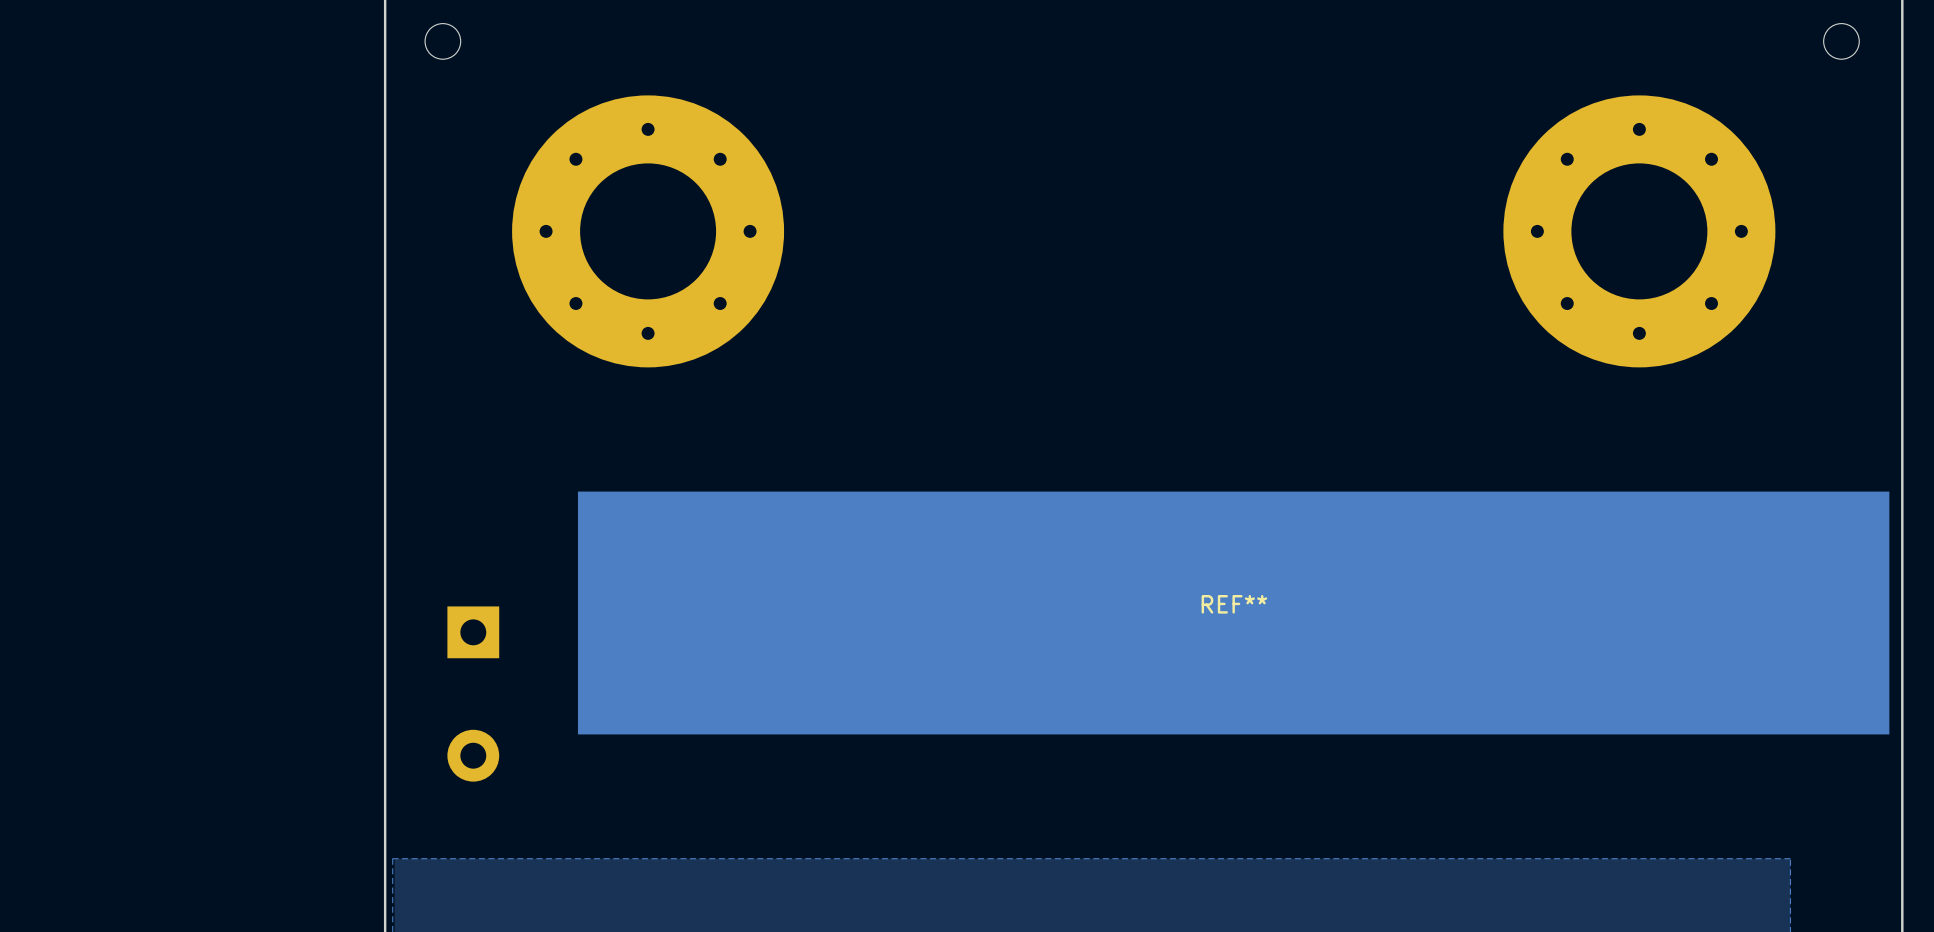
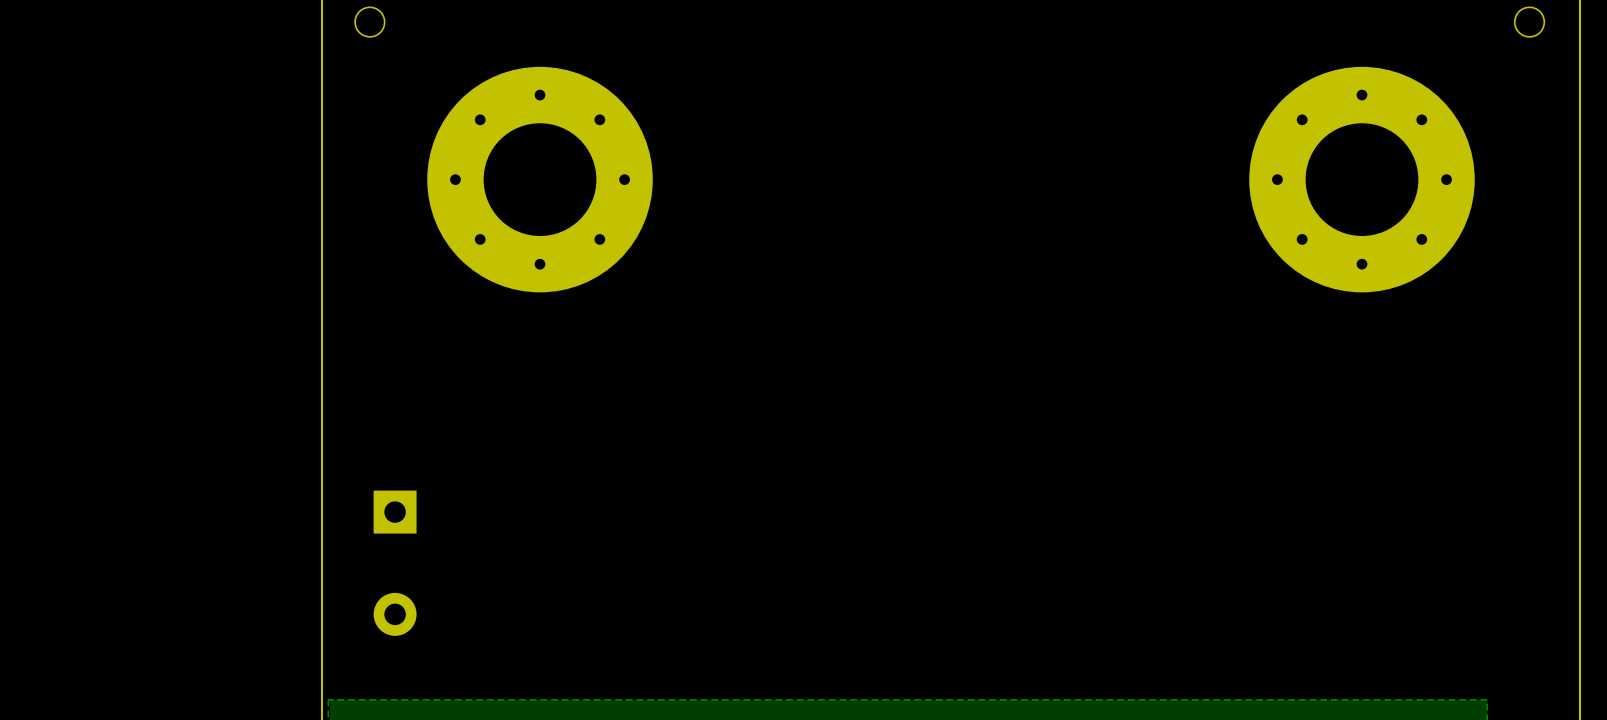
REF**: (1233, 613) -> none

